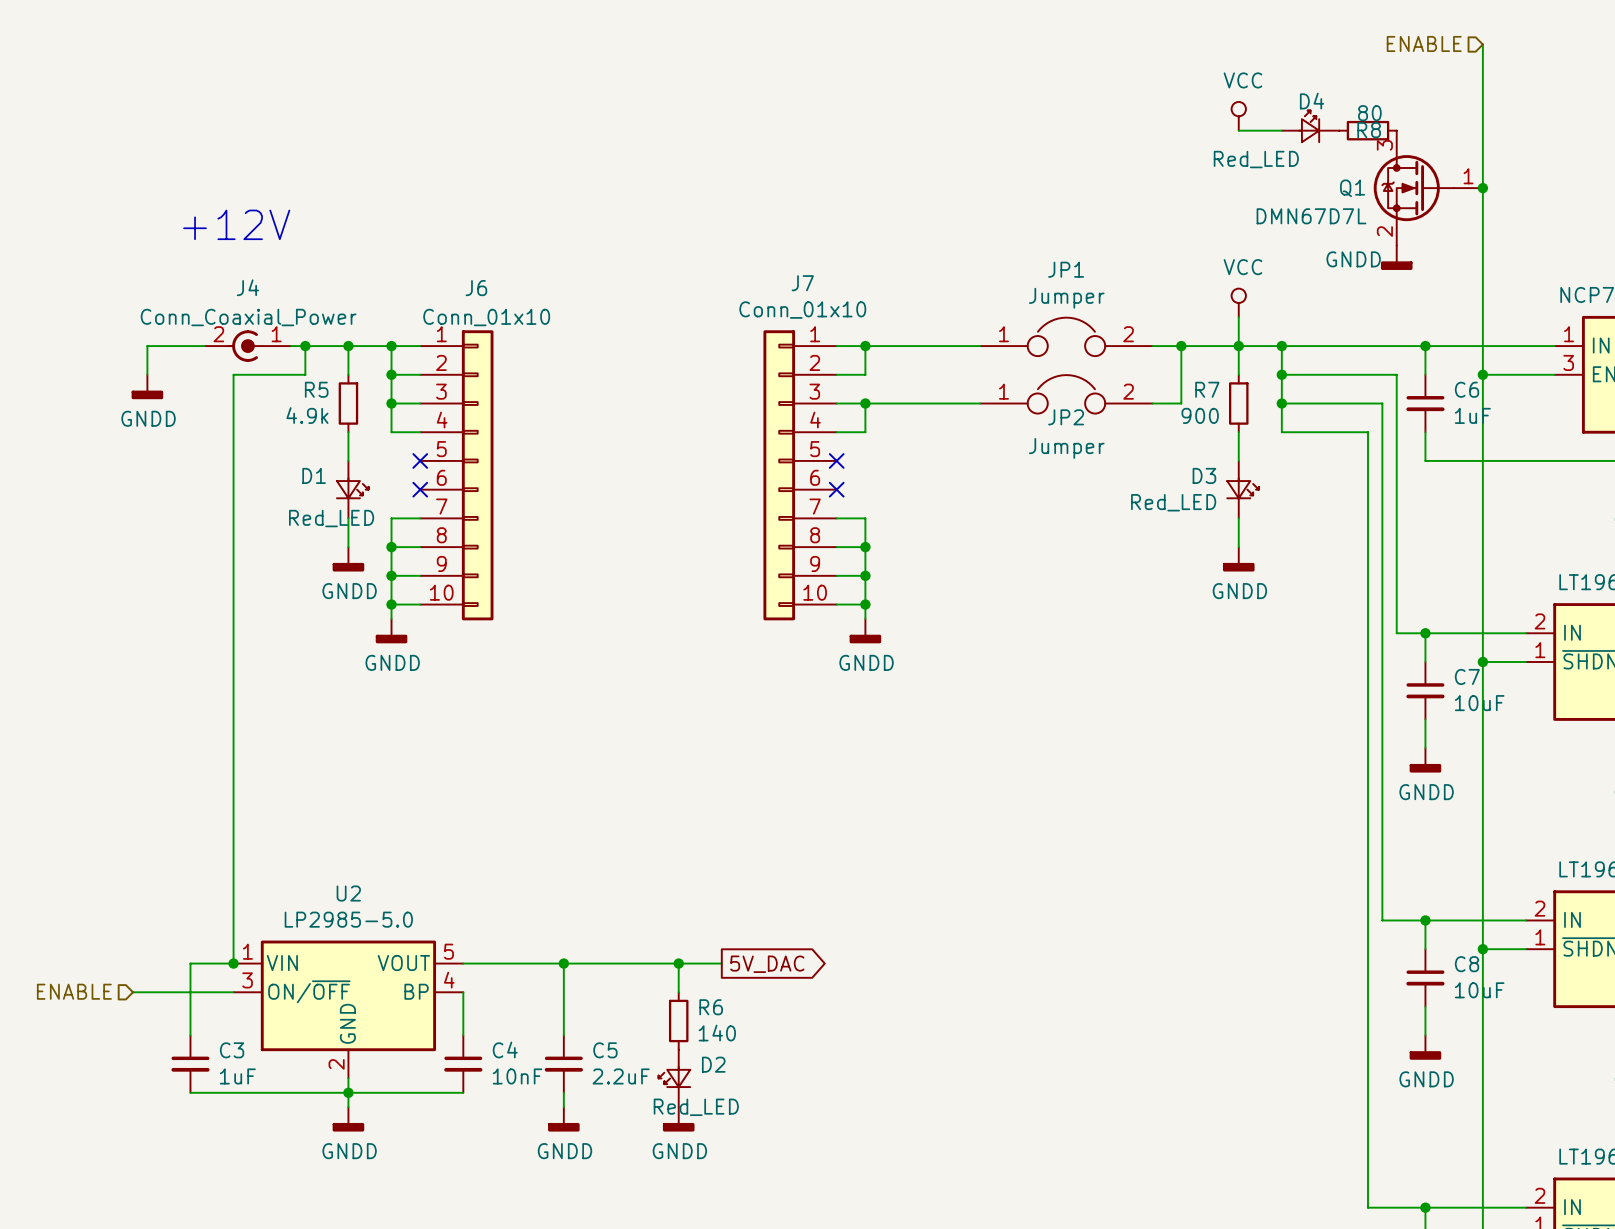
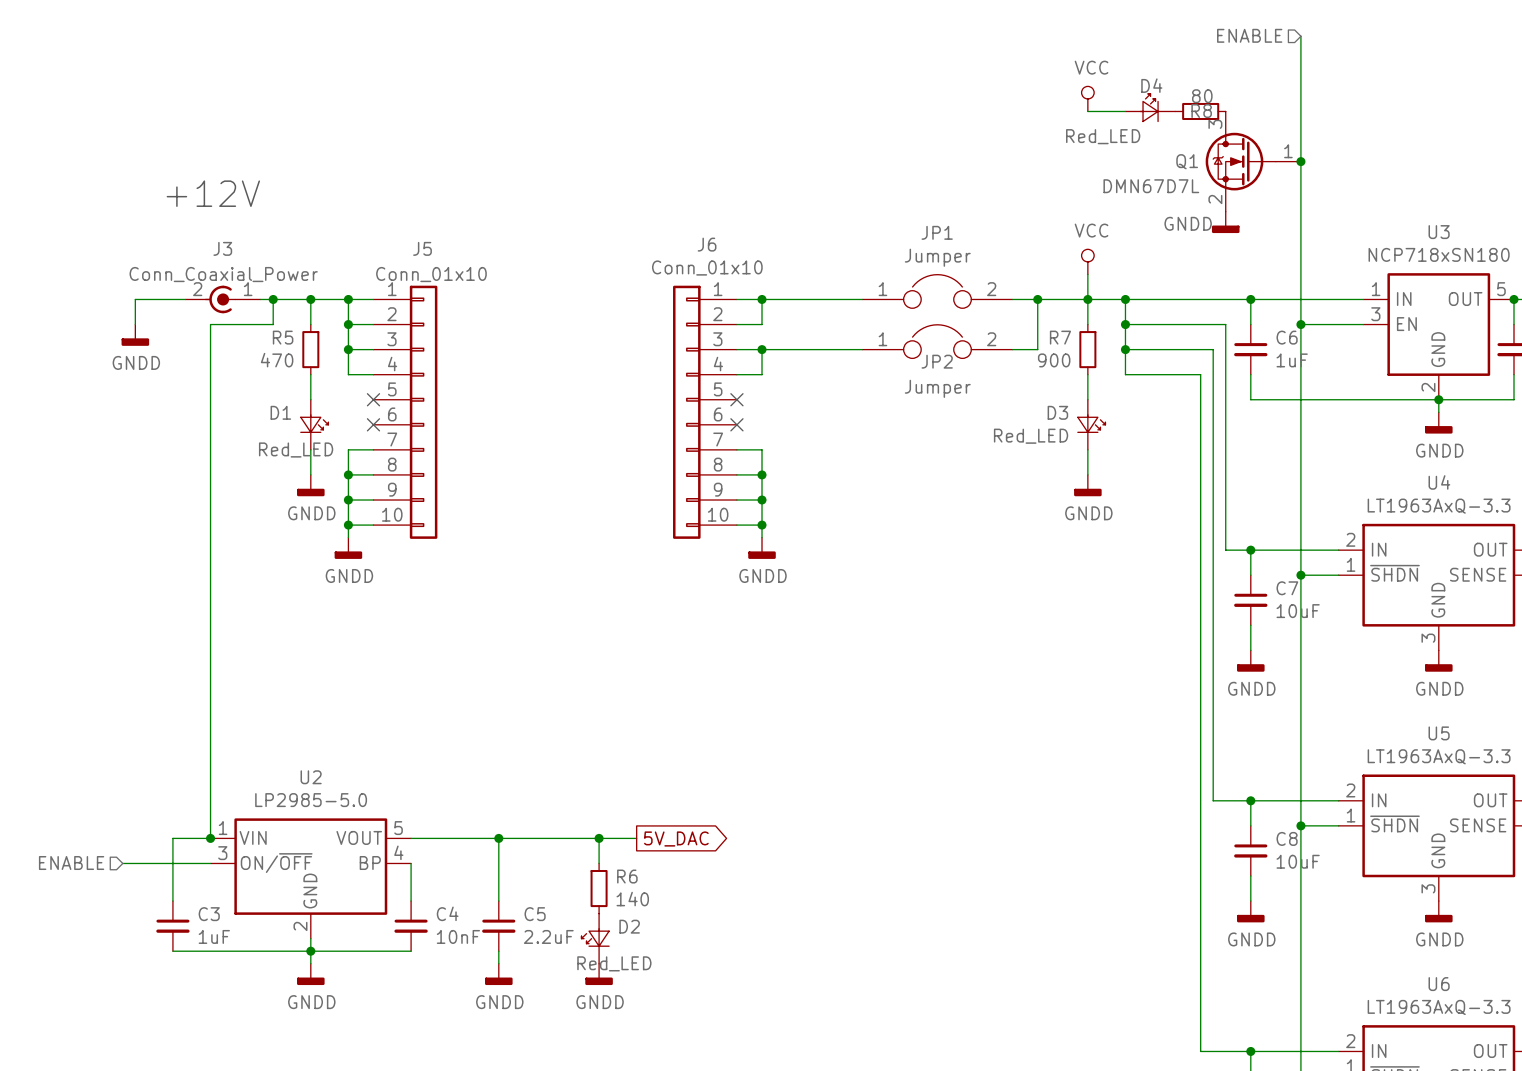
J7 name: J7 (802, 283) -> J6 (707, 244)
J4 name: J4 (247, 287) -> J3 (222, 248)
J6 name: J6 (476, 288) -> J5 (422, 248)
R5 value: 4.9k (307, 415) -> 470 (277, 360)

